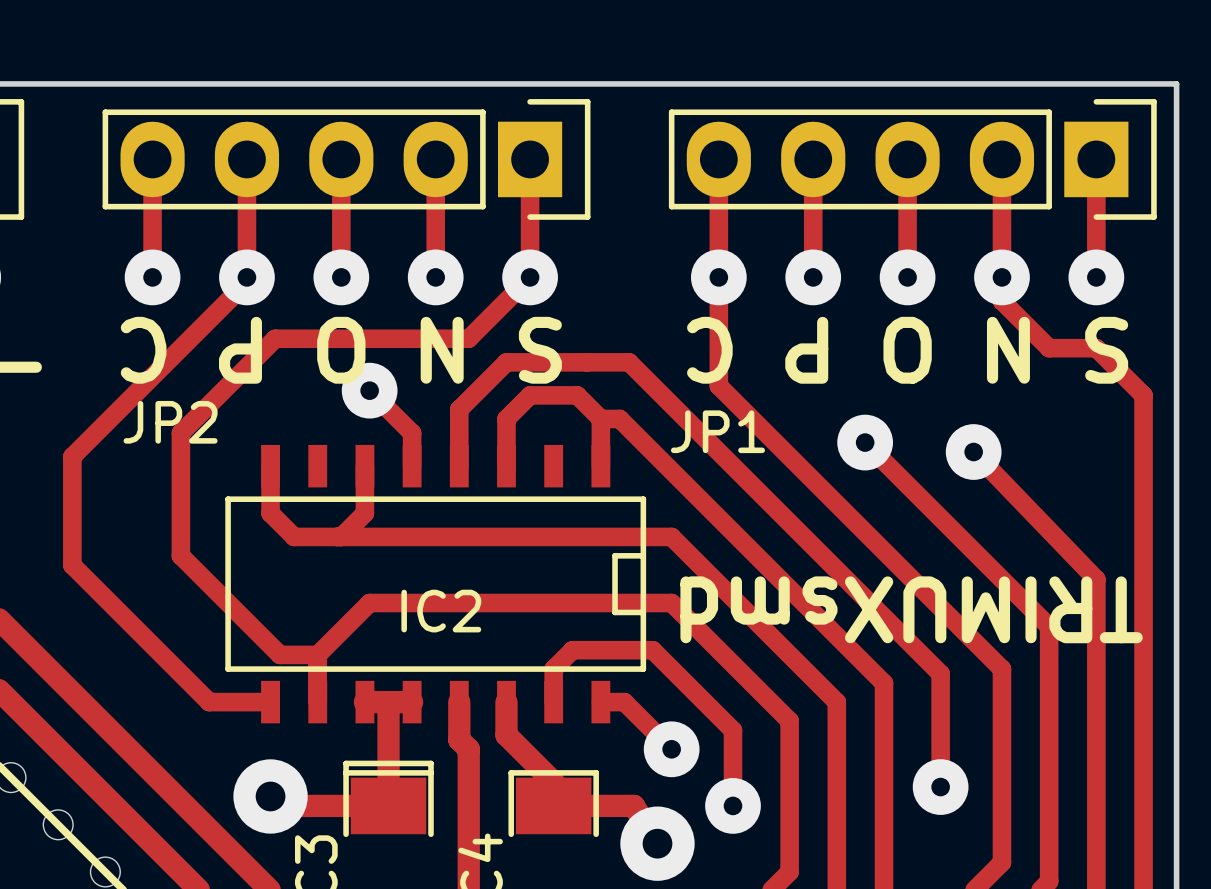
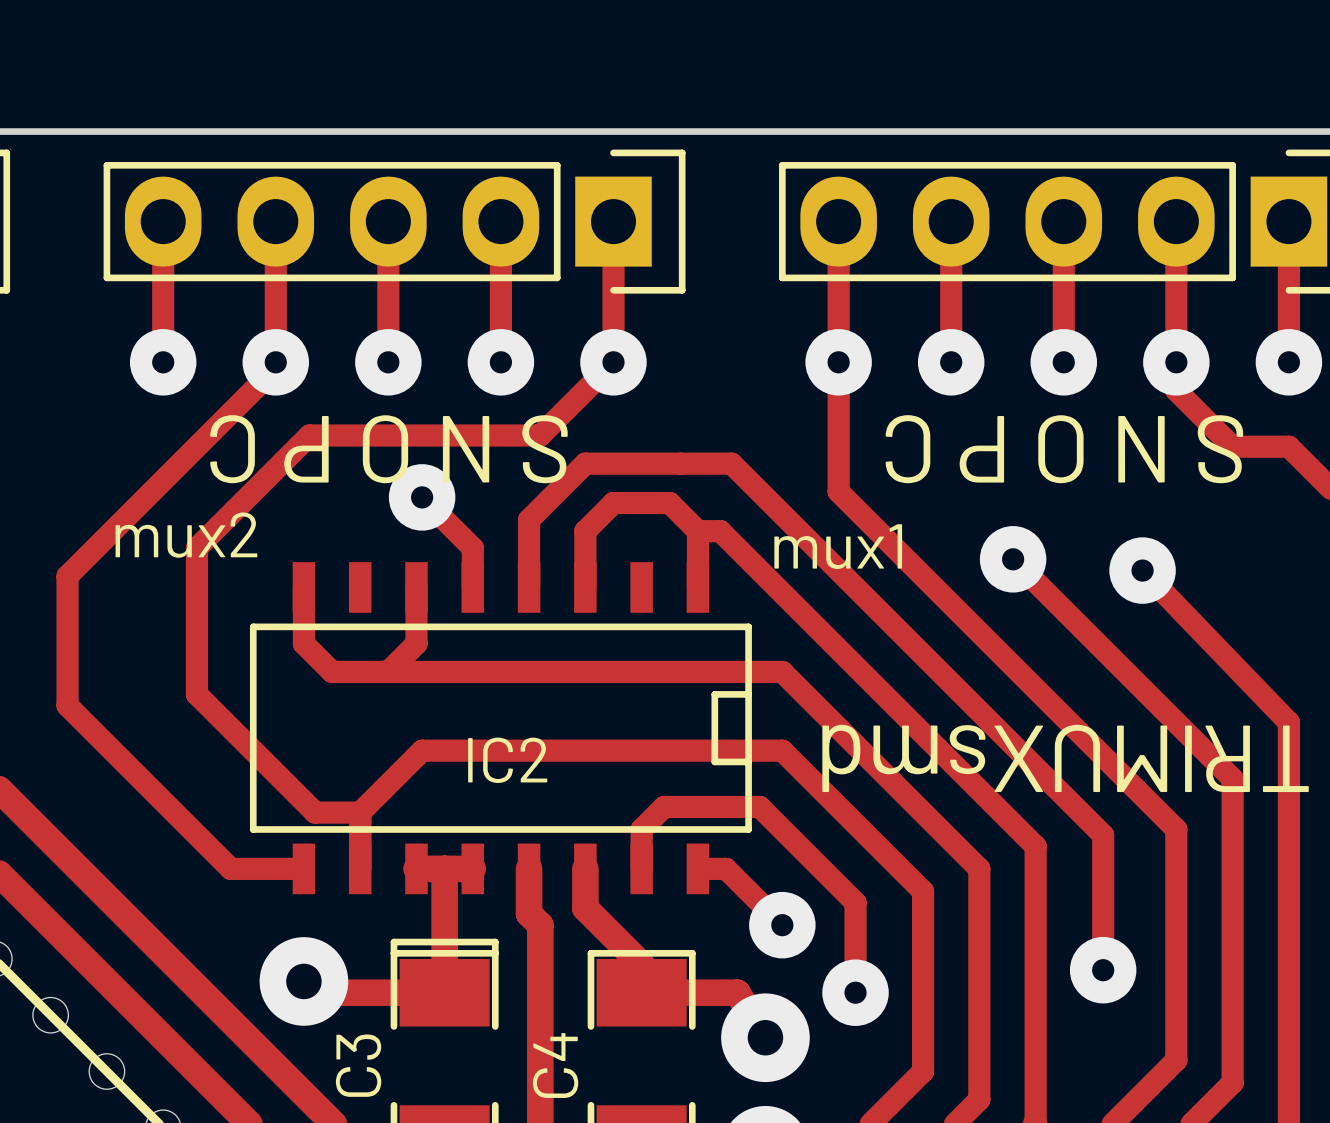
JP2 name: JP2 (170, 422) -> mux2 (186, 535)
JP1 name: JP1 (717, 431) -> mux1 (838, 546)

